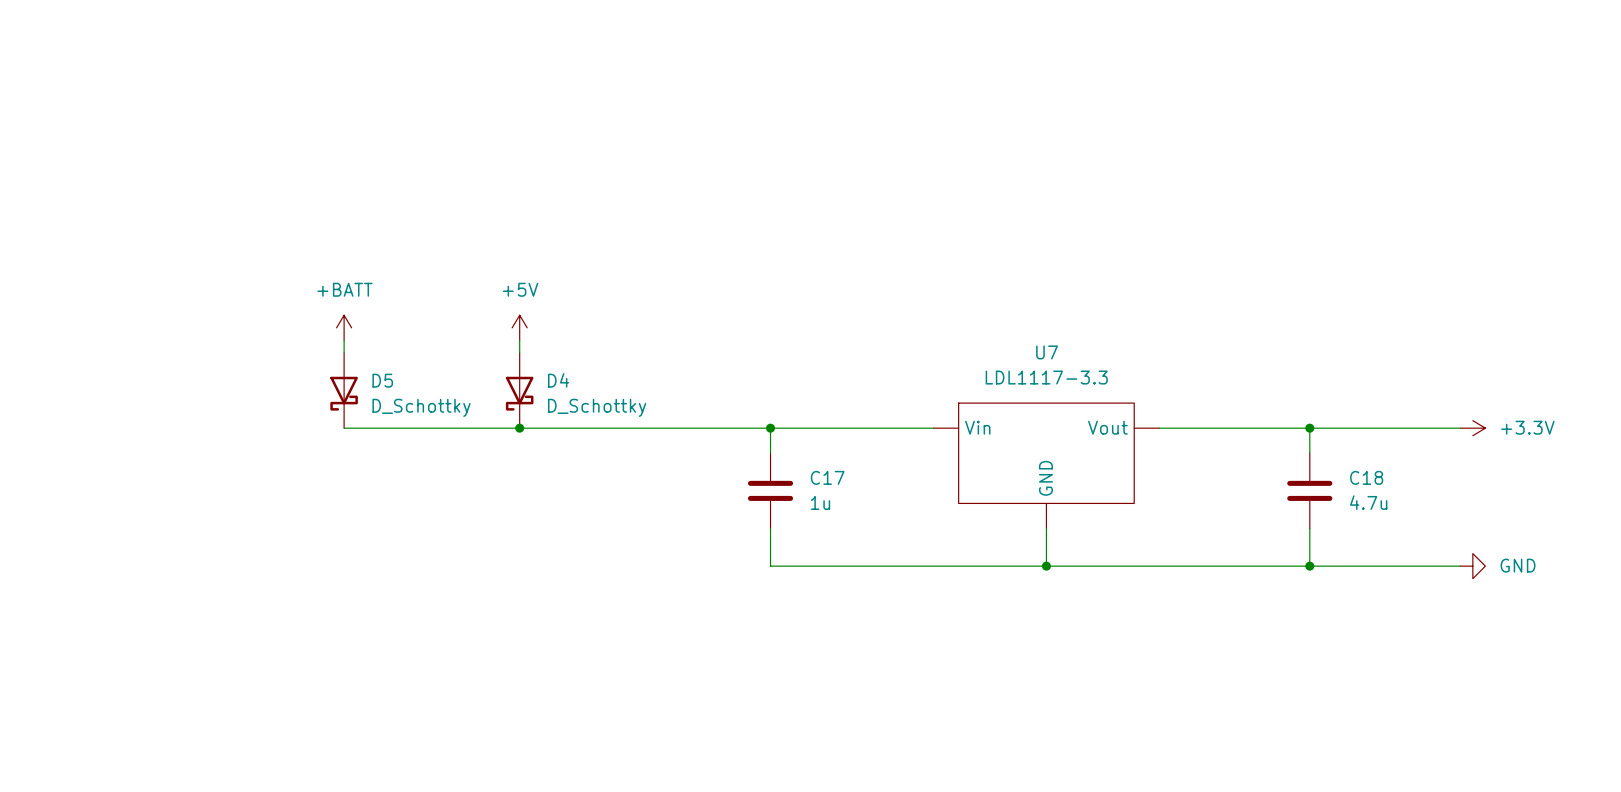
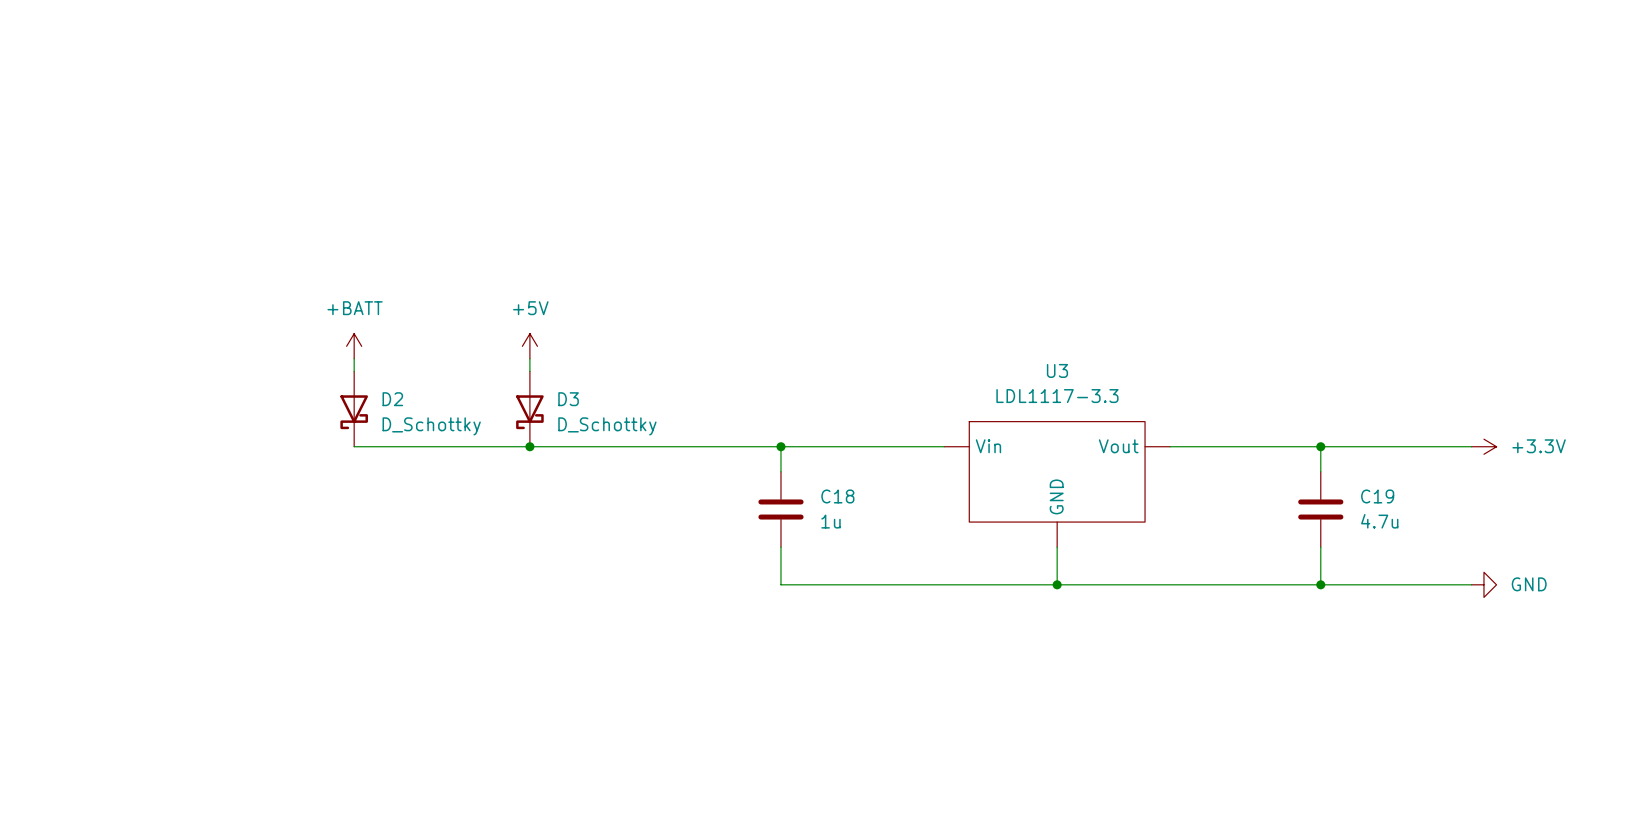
U7 name: U7 (1047, 352) -> U3 (1057, 370)
D5 name: D5 (382, 380) -> D2 (392, 399)
D4 name: D4 (558, 380) -> D3 (568, 399)
C17 name: C17 (827, 477) -> C18 (837, 496)
C18 name: C18 (1366, 477) -> C19 (1377, 496)

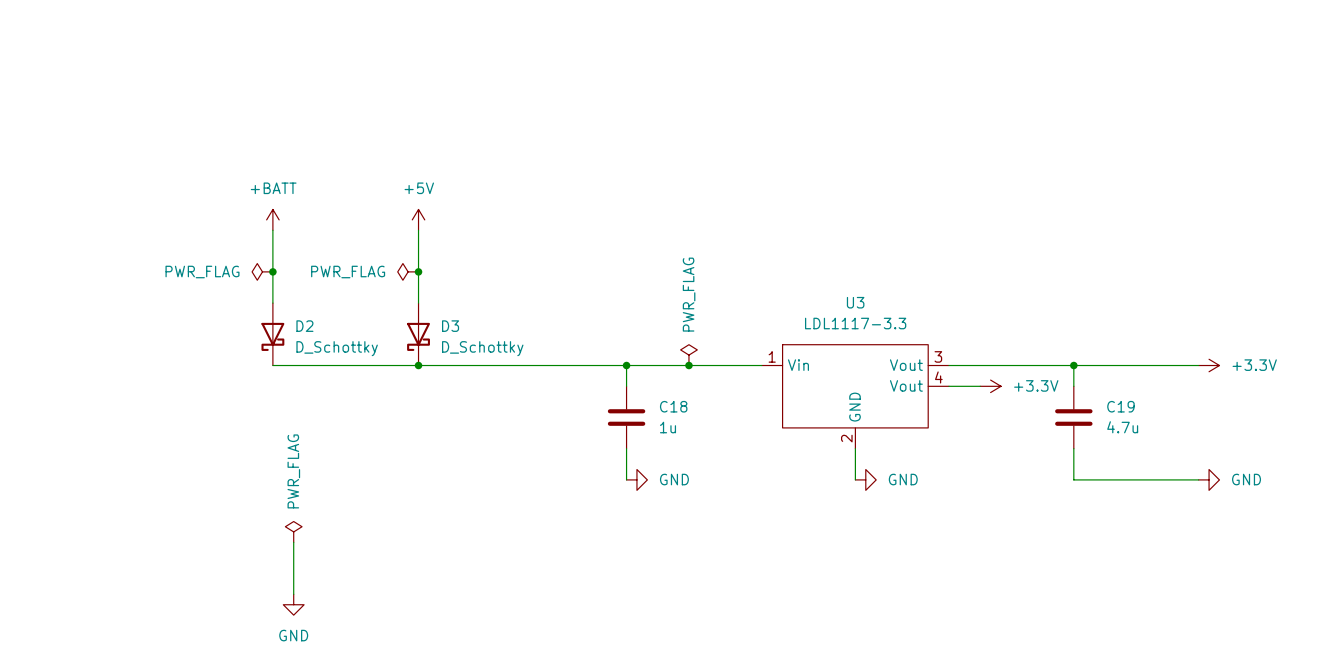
wire: none -> (272, 230) (272, 292)
wire: none -> (418, 230) (418, 292)
power symbol: none -> PWR_FLAG (262, 271)
junction: none -> (272, 271)
power symbol: none -> PWR_FLAG (408, 271)
junction: none -> (418, 271)
power symbol position: +BATT (354, 346) -> +BATT (272, 219)
power symbol position: +5V (529, 346) -> +5V (418, 219)
U3 symbol: [944, 421, 1171, 548] -> [761, 344, 950, 449]
power symbol: none -> PWR_FLAG (688, 355)
junction: none -> (688, 365)
wire: none -> (949, 386) (980, 386)
power symbol: none -> +3.3V (990, 386)
wire: (780, 584) (1320, 584) -> none
power symbol: none -> GND (636, 479)
junction: (1057, 584) -> none
power symbol: none -> GND (865, 479)
junction: (1320, 584) -> none
power symbol: none -> PWR_FLAG (293, 531)
wire: none -> (293, 542) (293, 594)
power symbol: none -> GND (293, 604)

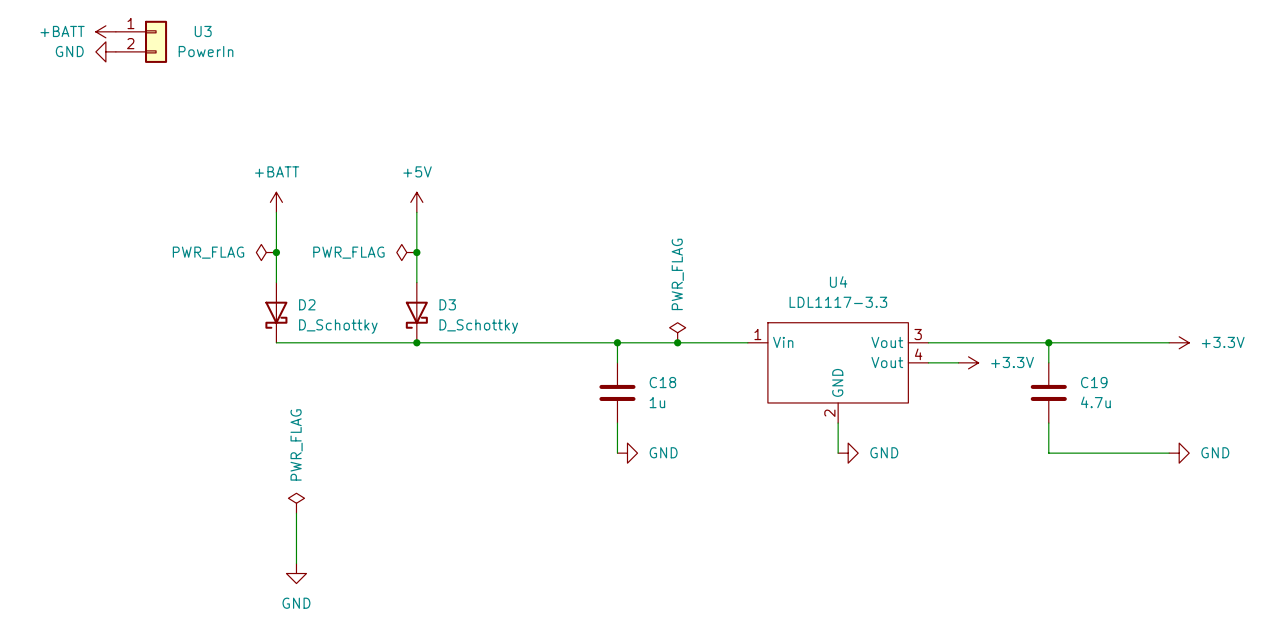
power symbol: none -> +BATT (105, 31)
U3: none -> PowerIn (141, 41)
power symbol: none -> GND (105, 51)
U3 name: U3 (855, 302) -> U4 (838, 282)

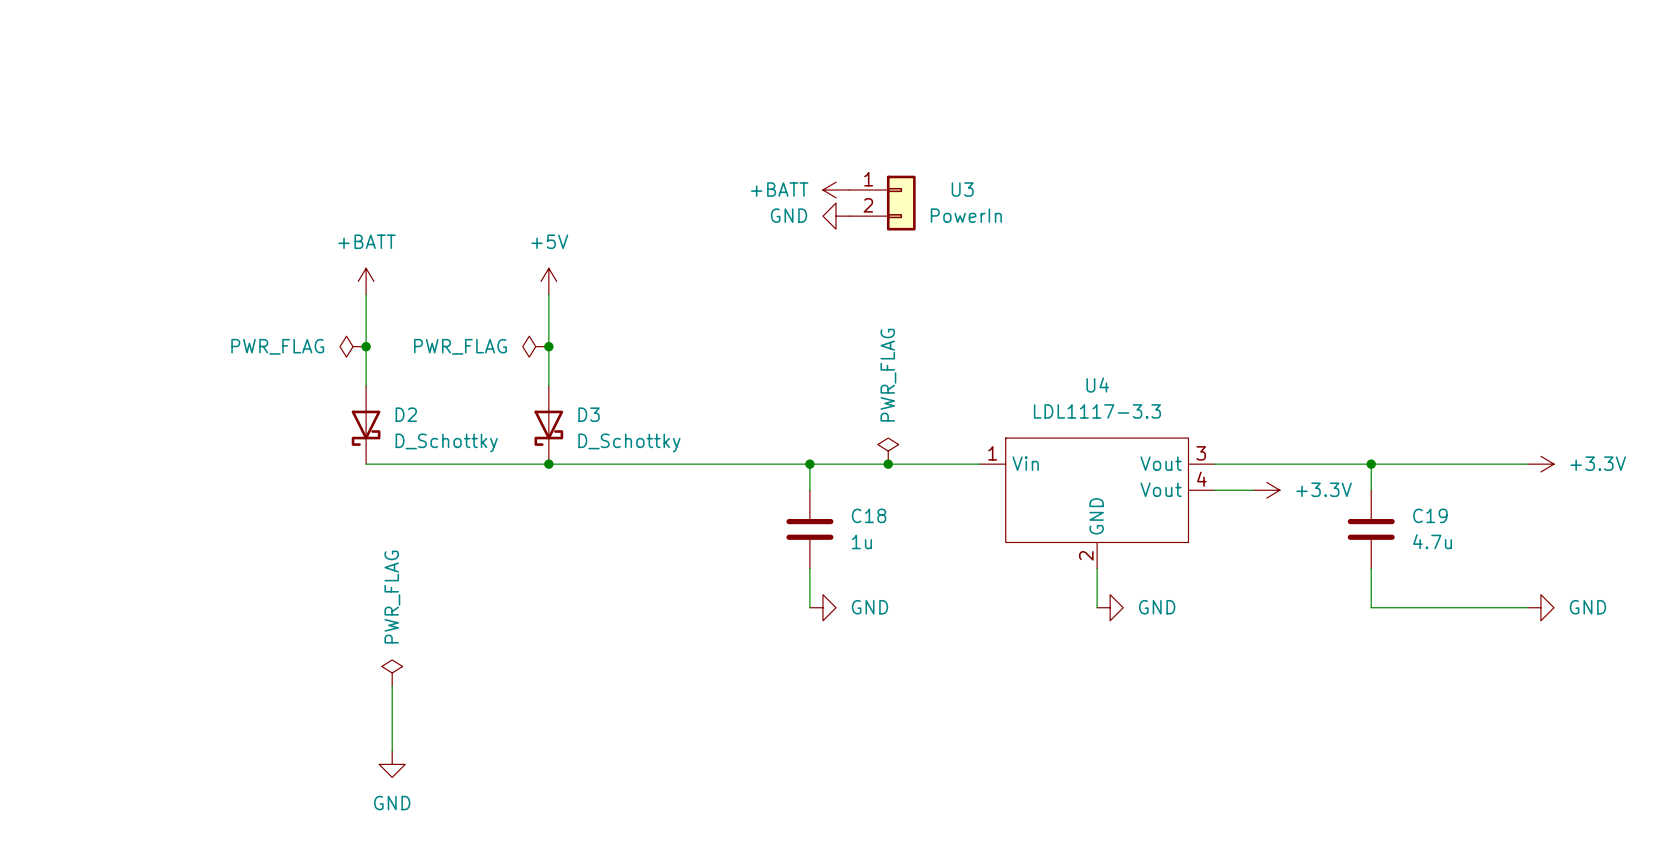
power symbol: +BATT (105, 31) -> none
U3 position: (141, 41) -> (882, 203)
power symbol: GND (105, 51) -> none
power symbol: none -> +BATT (836, 190)
power symbol: none -> GND (836, 216)

